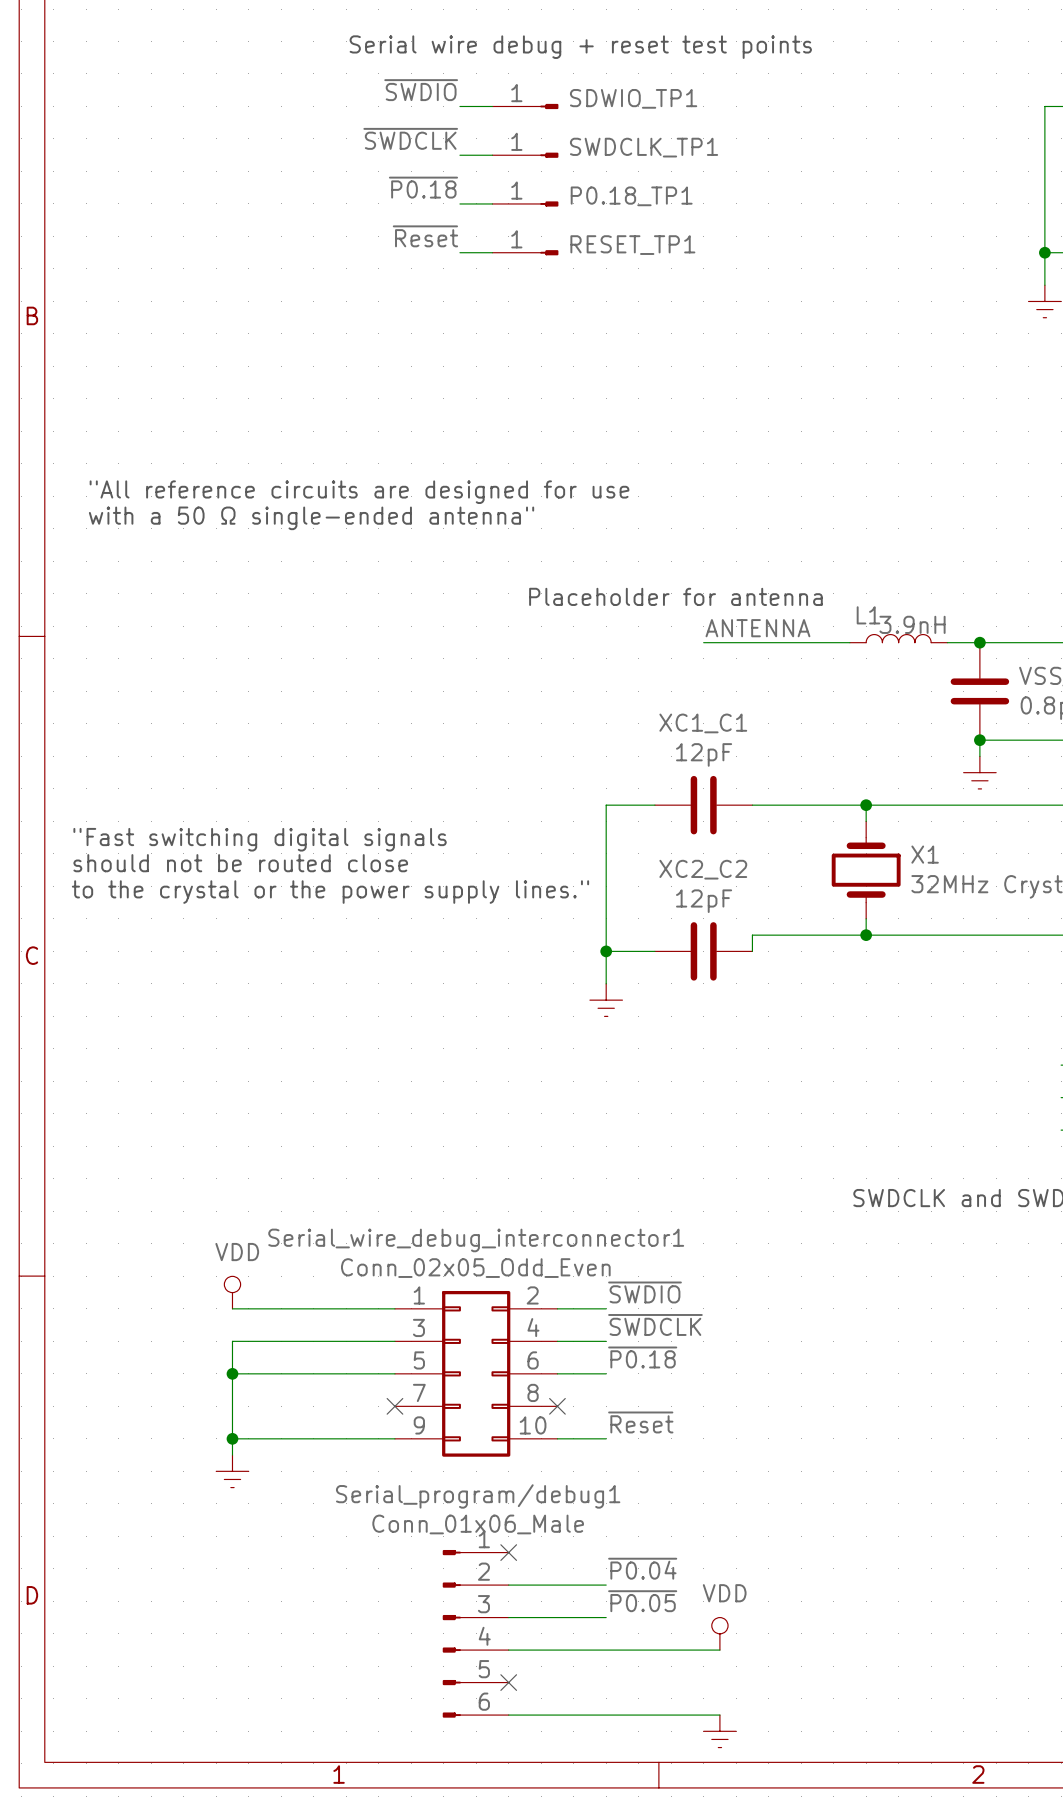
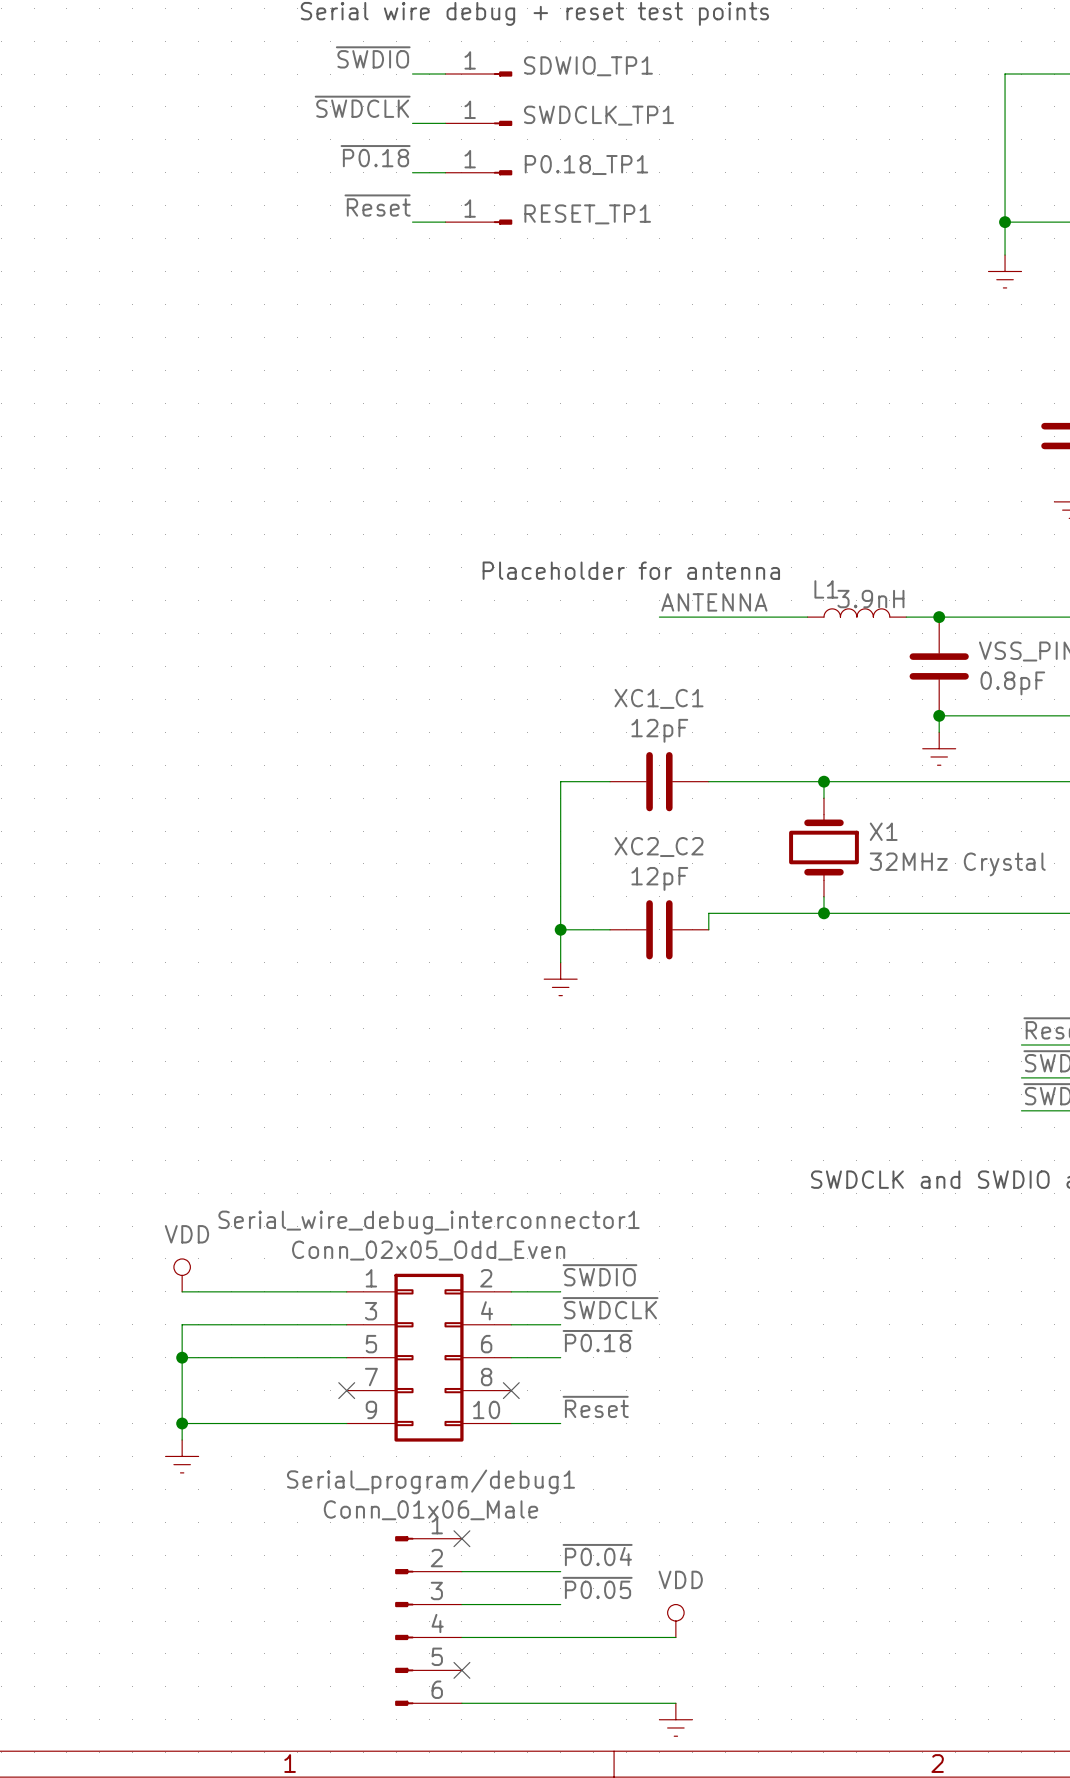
text: "All reference circuits are designed for use (359, 492) -> none
text: with a 50 Ω single-ended antenna" (311, 518) -> none
text: "Fast switching digital signals (260, 839) -> none
text: should not be routed close (240, 863) -> none
text: to the crystal or the power supply lines." (330, 892) -> none

